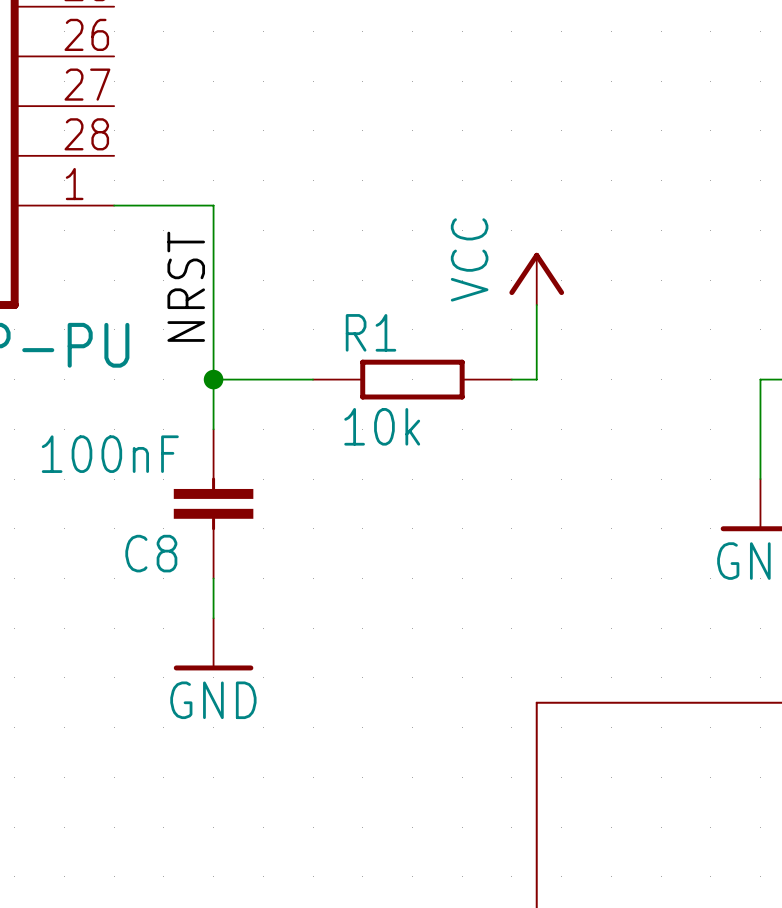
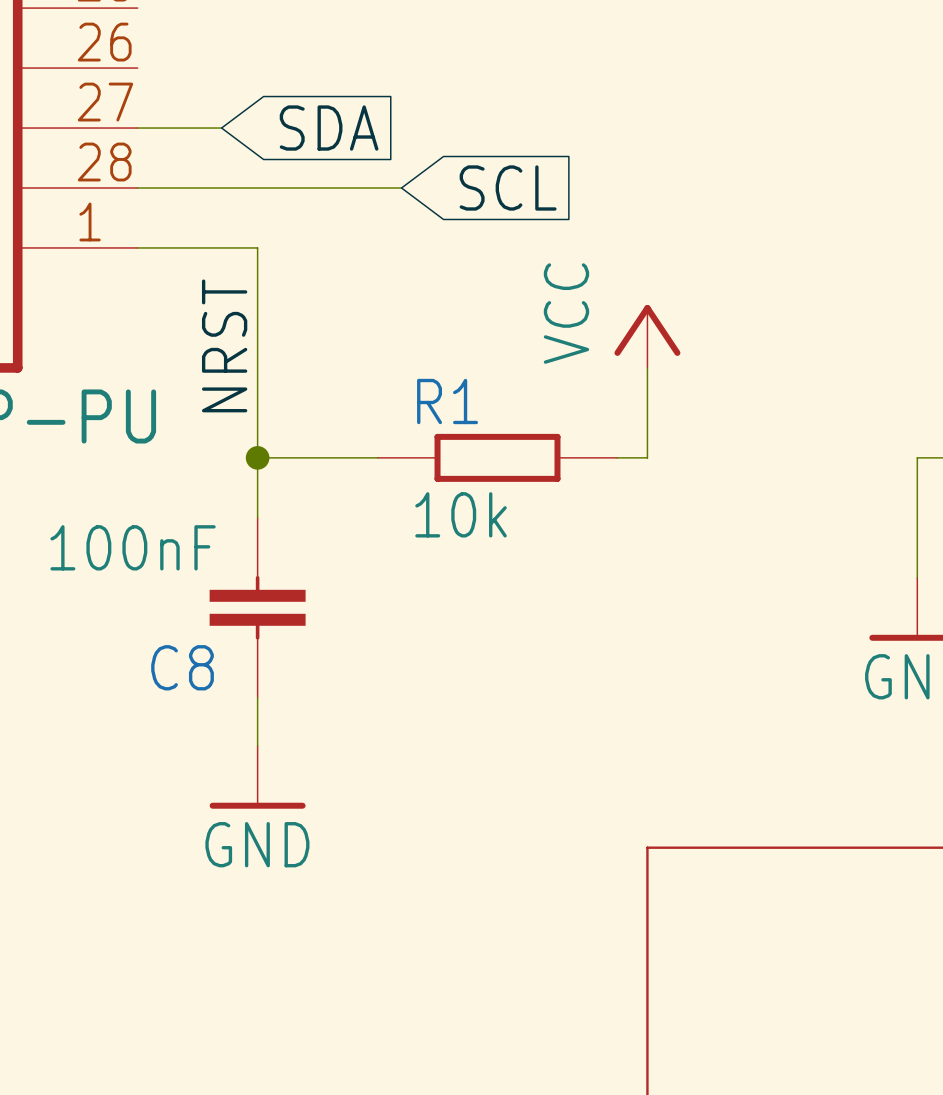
wire: none -> (137, 128) (221, 128)
global label: none -> SDA (329, 128)
wire: none -> (137, 187) (401, 187)
global label: none -> SCL (508, 187)

